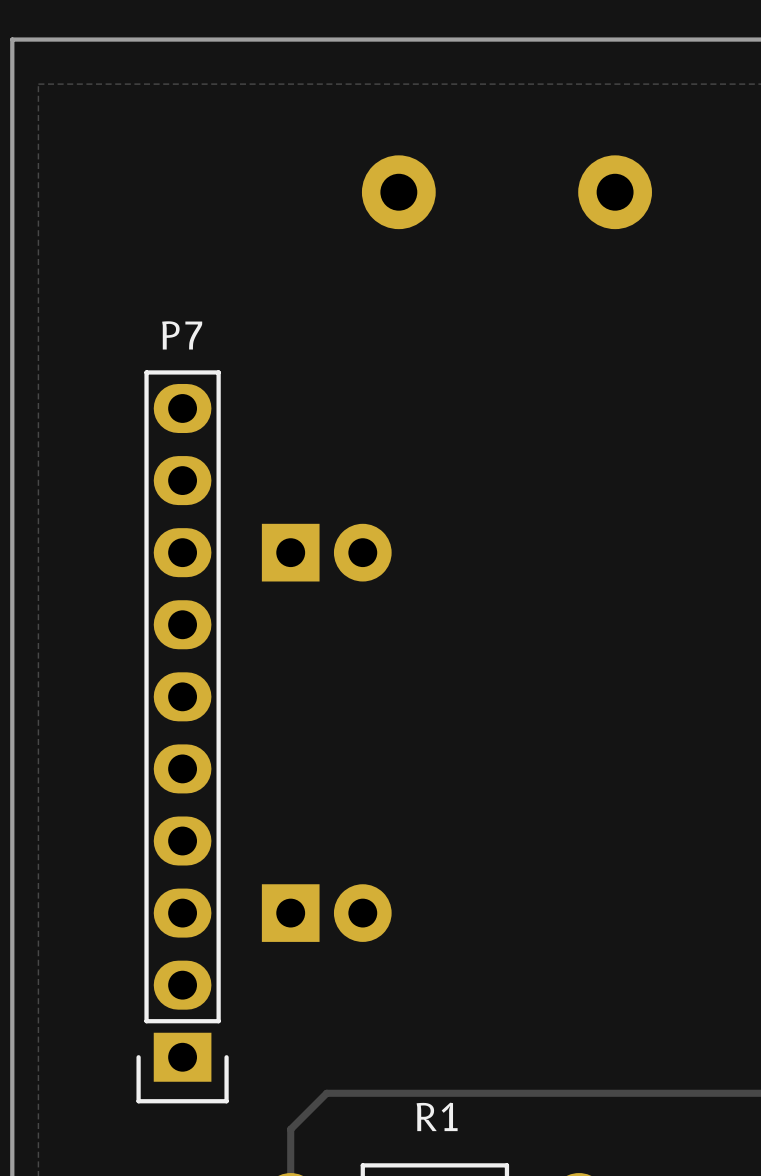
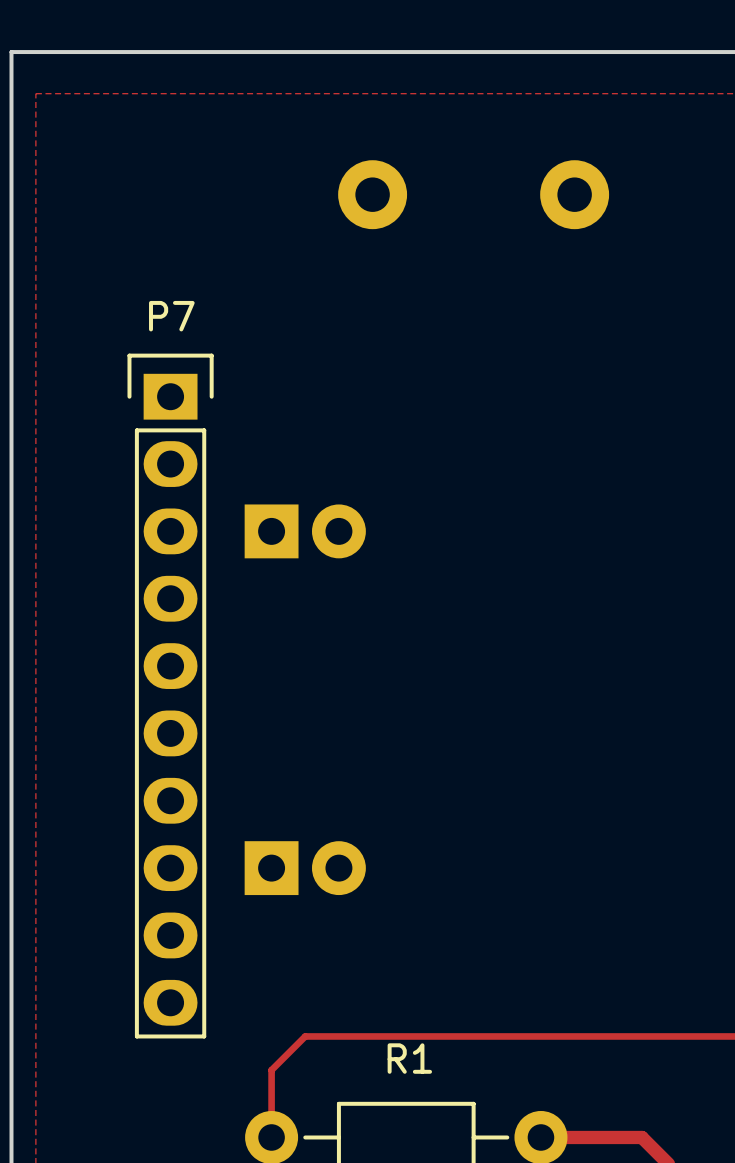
P7 rotation: 0° (182, 736) -> 180° (170, 696)

